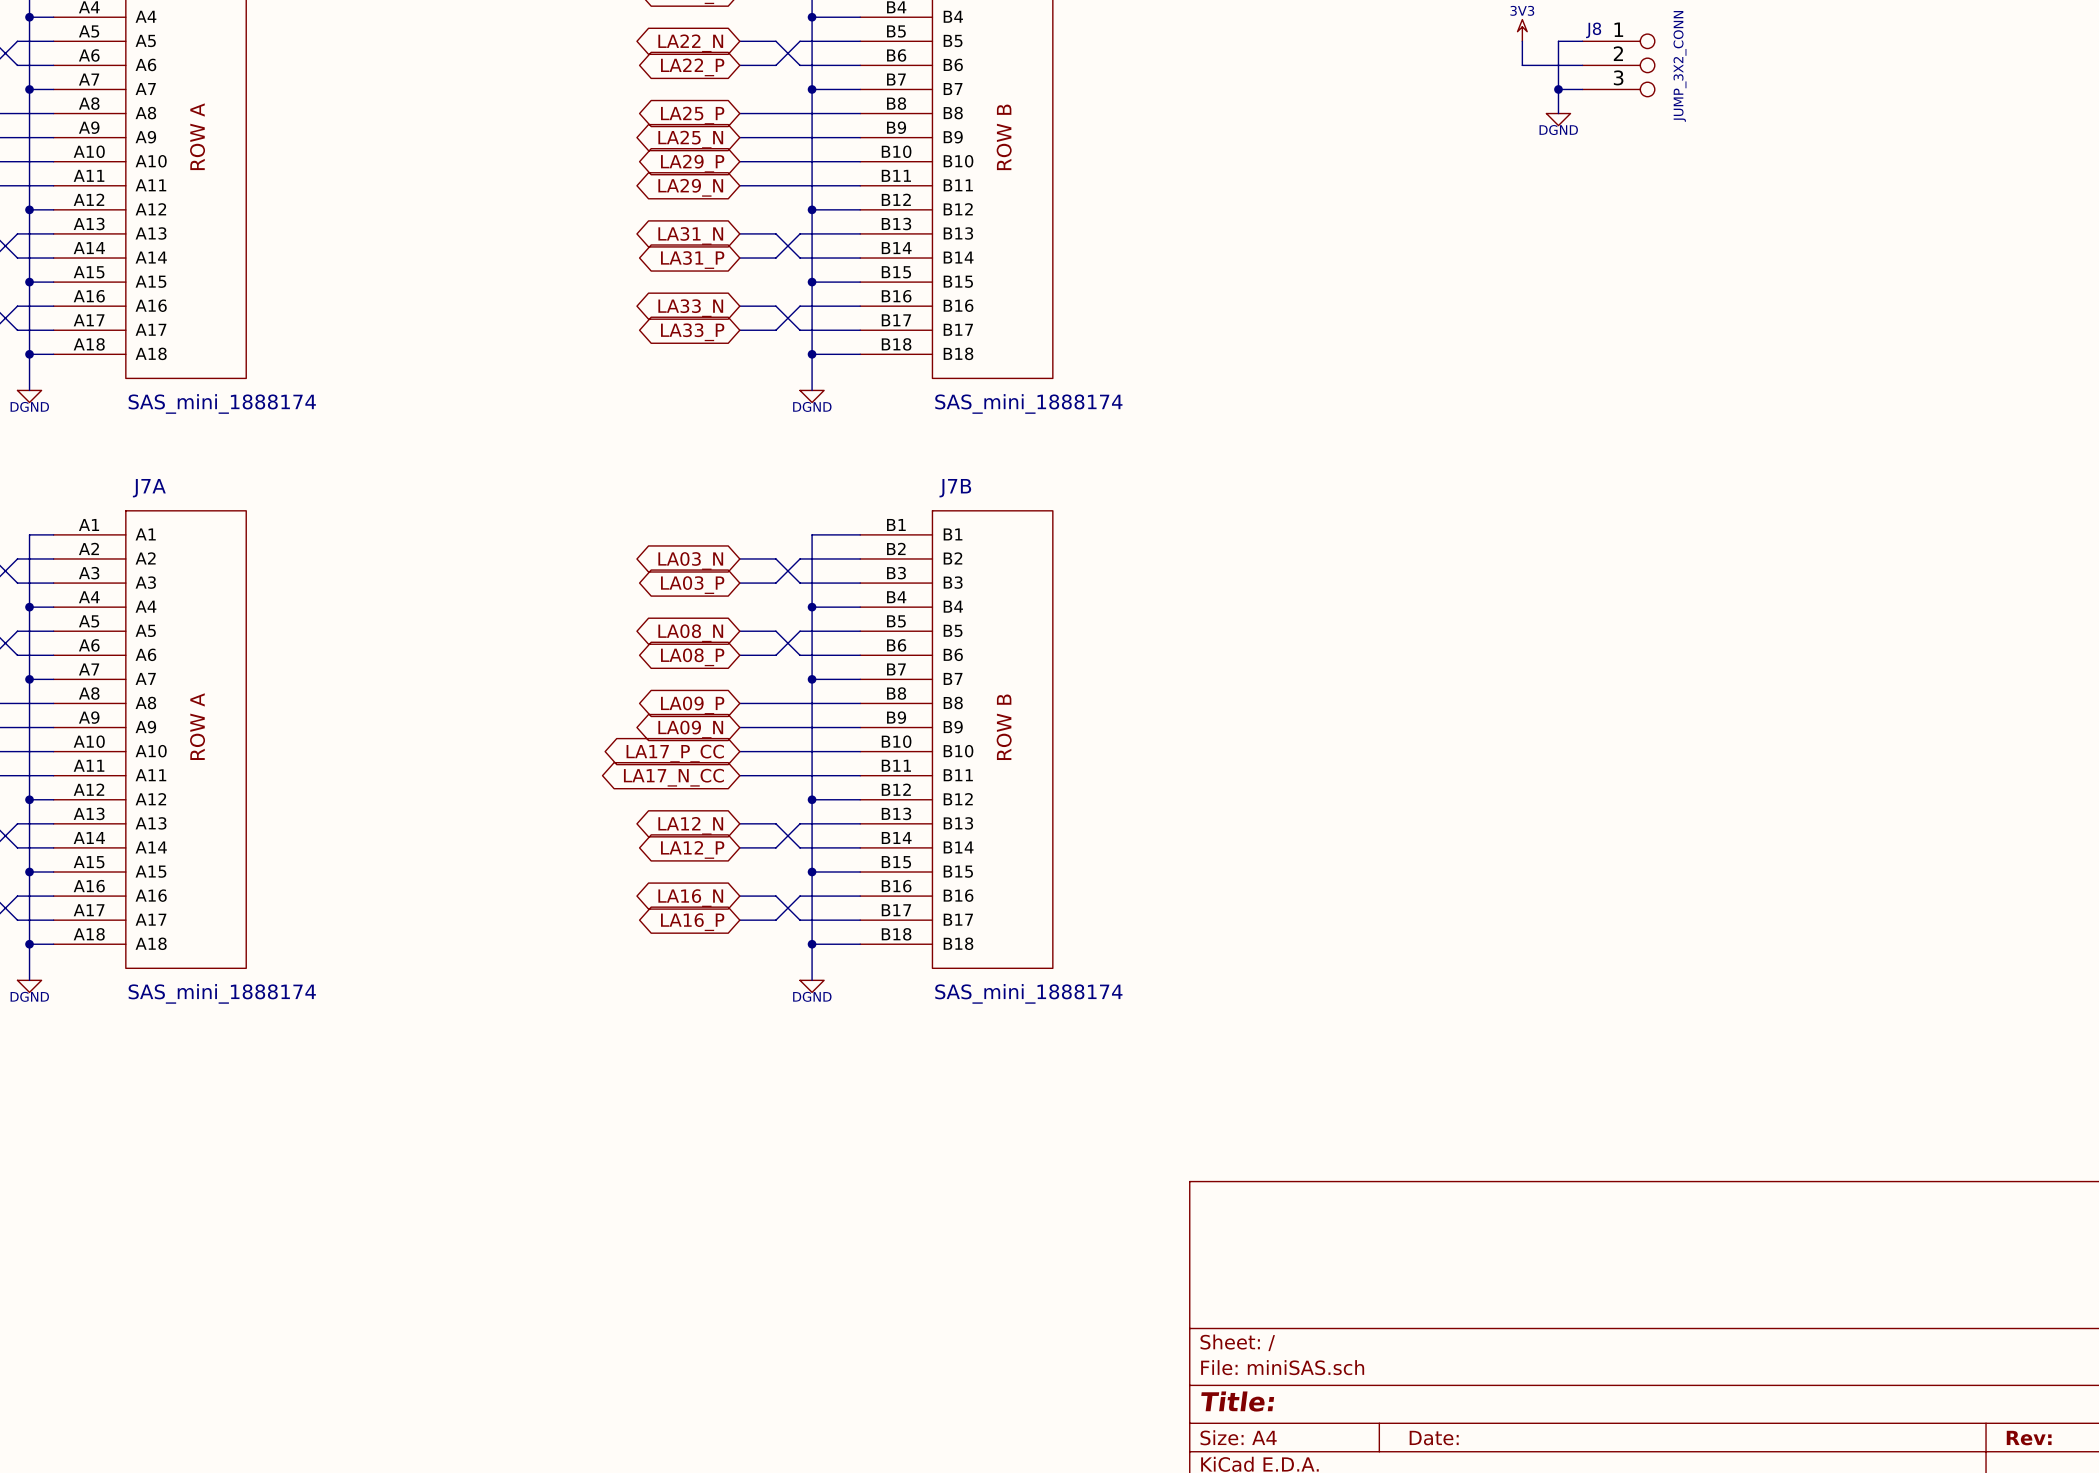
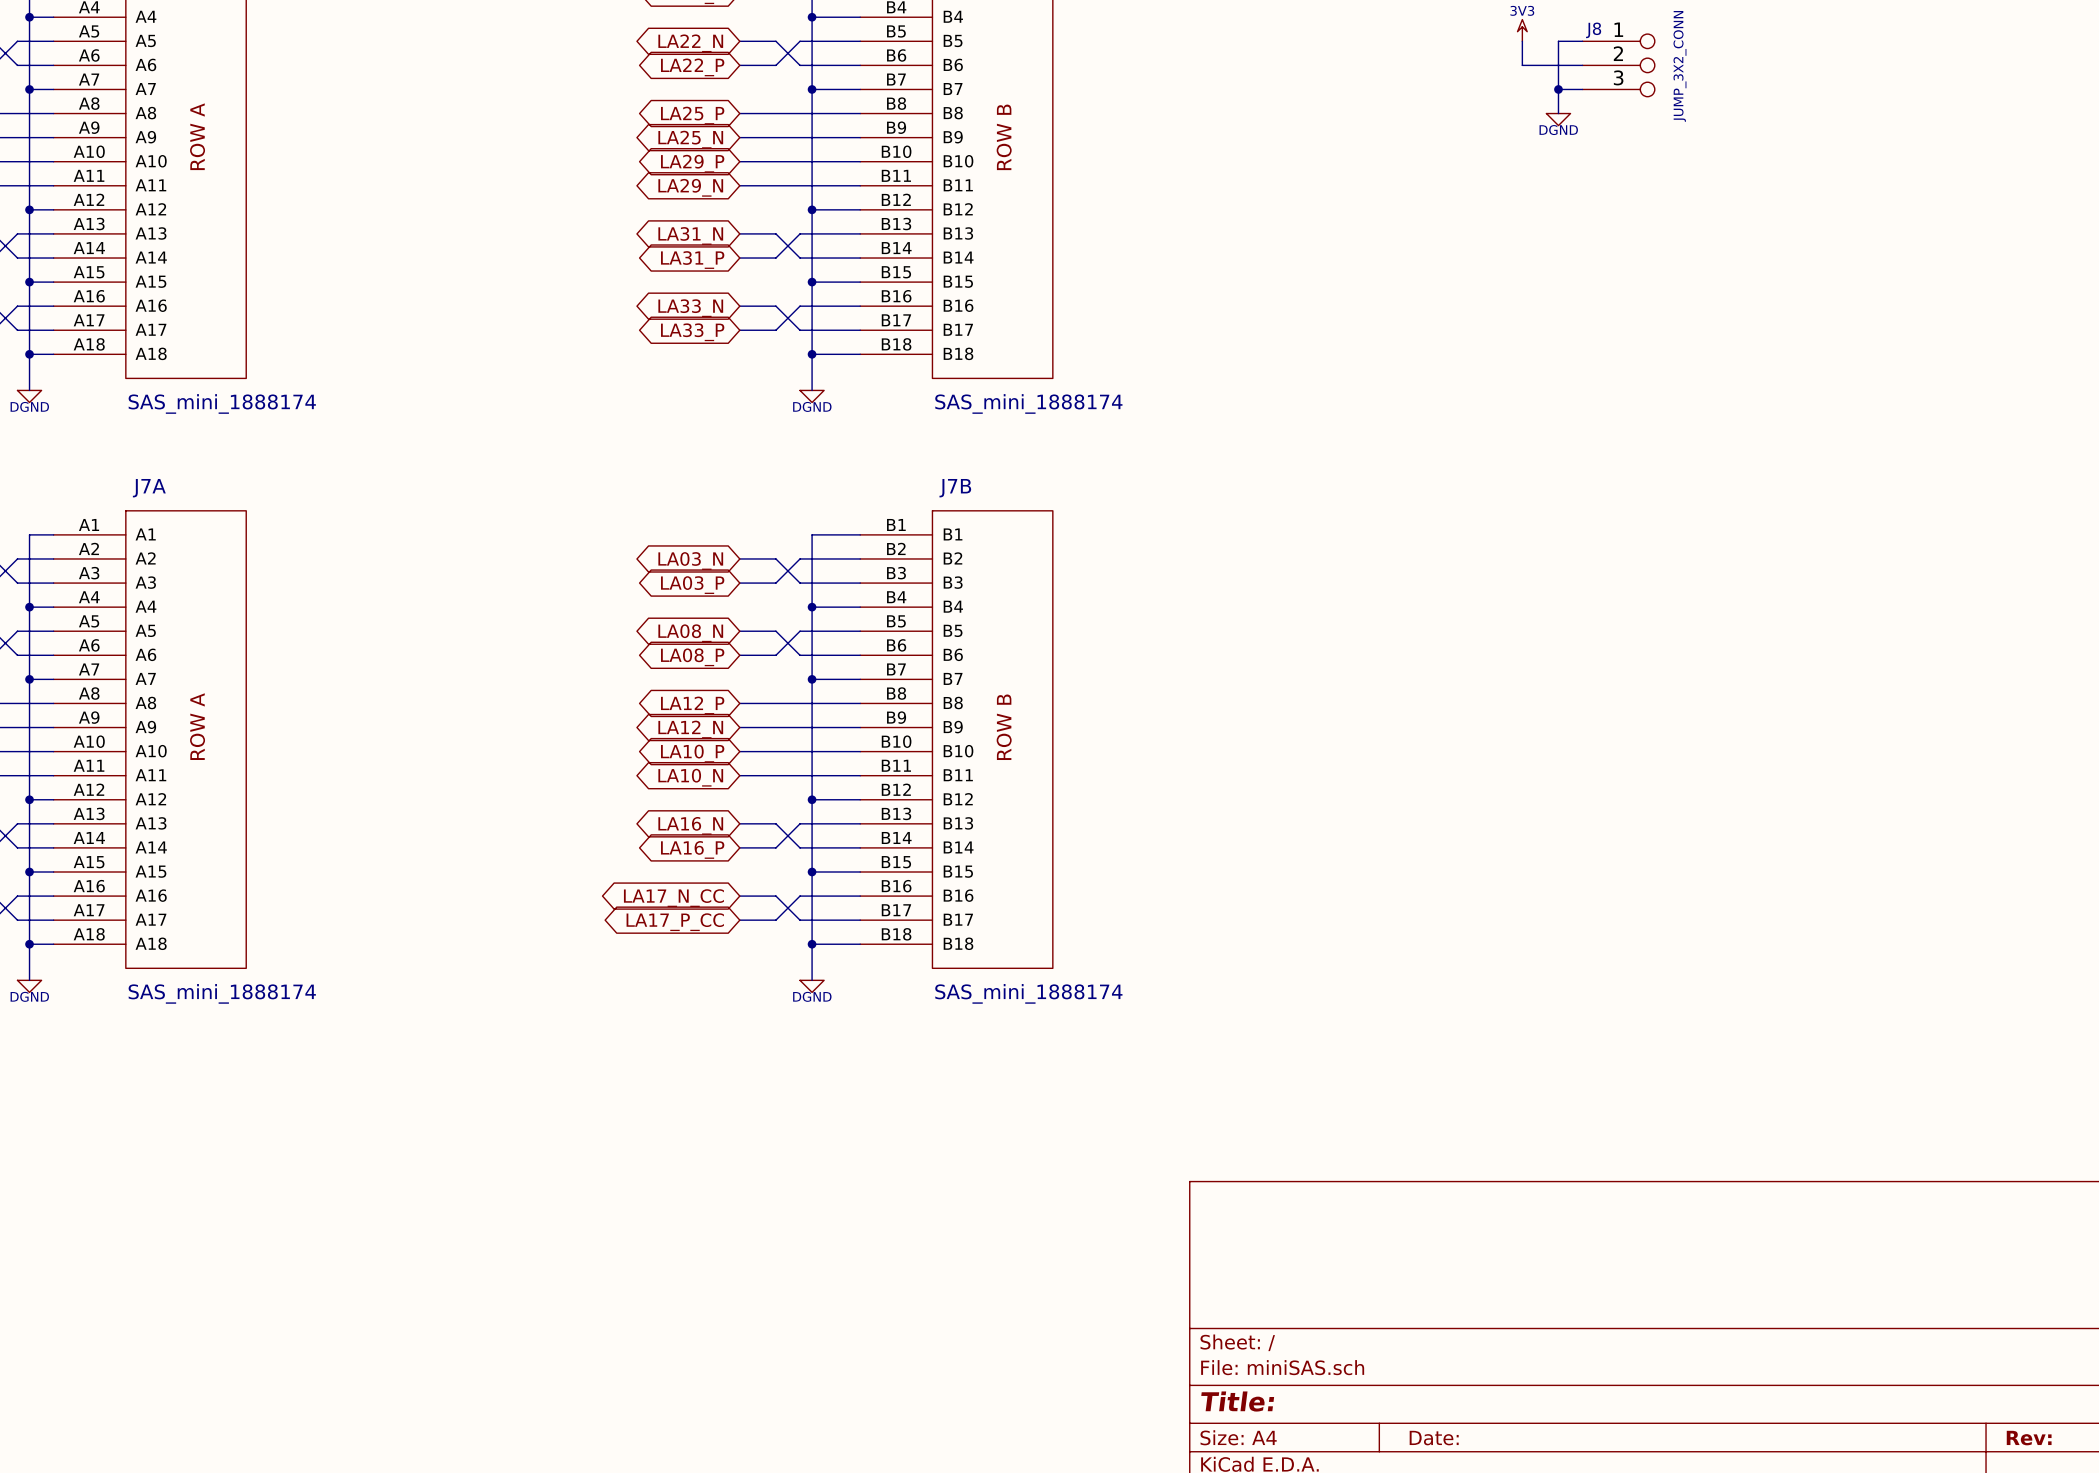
global label: LA09_P (692, 705) -> LA12_P (692, 705)
global label: LA09_N (690, 729) -> LA12_N (690, 729)
global label: LA17_P_CC (675, 753) -> LA10_P (692, 753)
global label: LA17_N_CC (673, 777) -> LA10_N (690, 777)
global label: LA12_N (690, 825) -> LA16_N (690, 825)
global label: LA12_P (692, 849) -> LA16_P (692, 849)
global label: LA16_N (690, 898) -> LA17_N_CC (673, 898)
global label: LA16_P (692, 922) -> LA17_P_CC (675, 922)

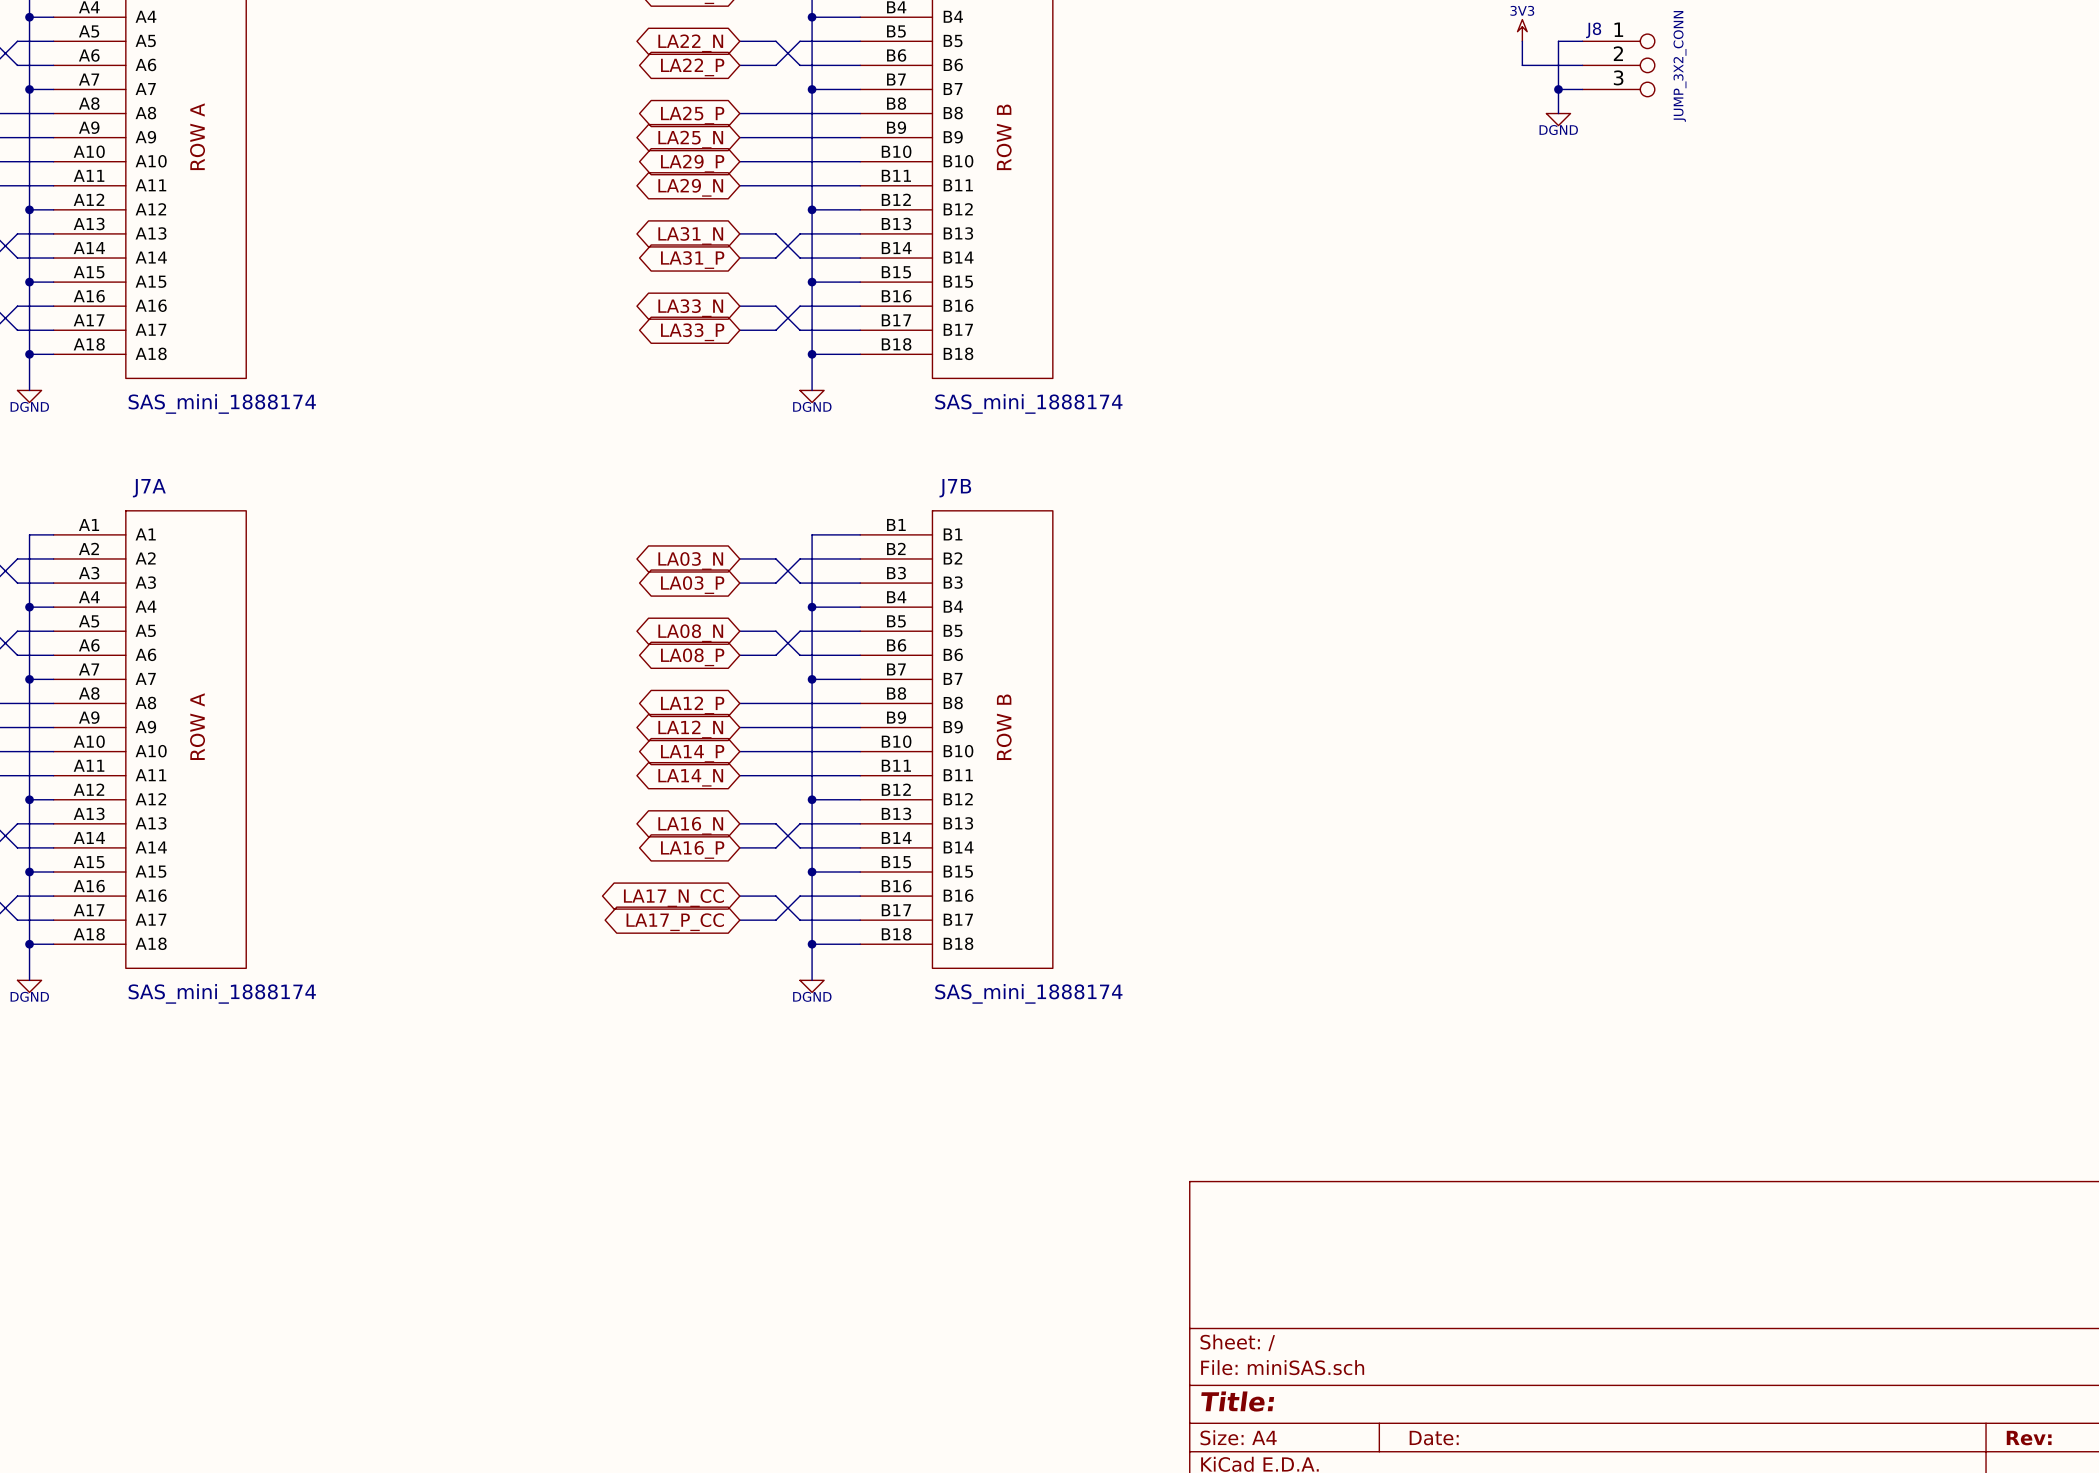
global label: LA10_P (692, 753) -> LA14_P (692, 753)
global label: LA10_N (690, 777) -> LA14_N (690, 777)

